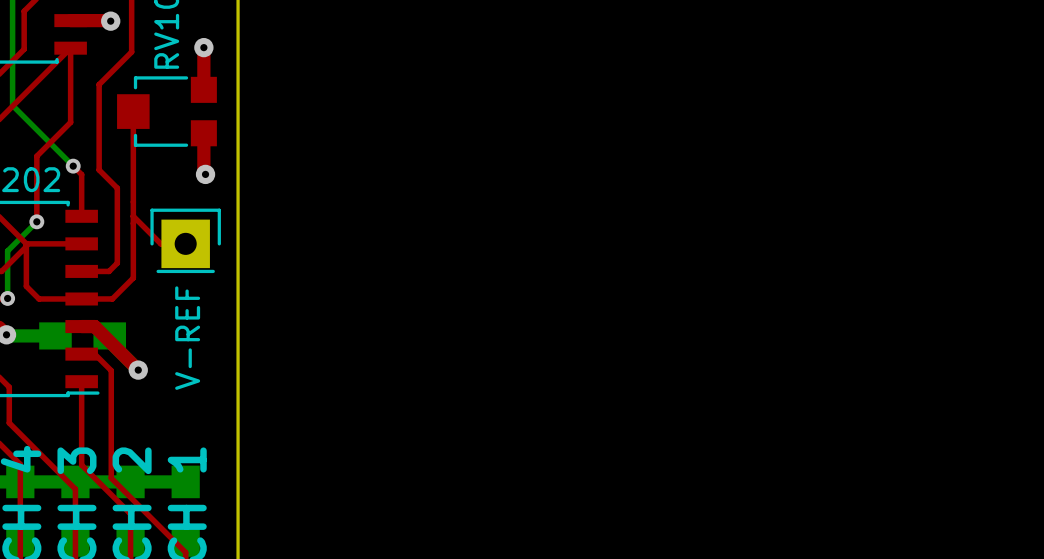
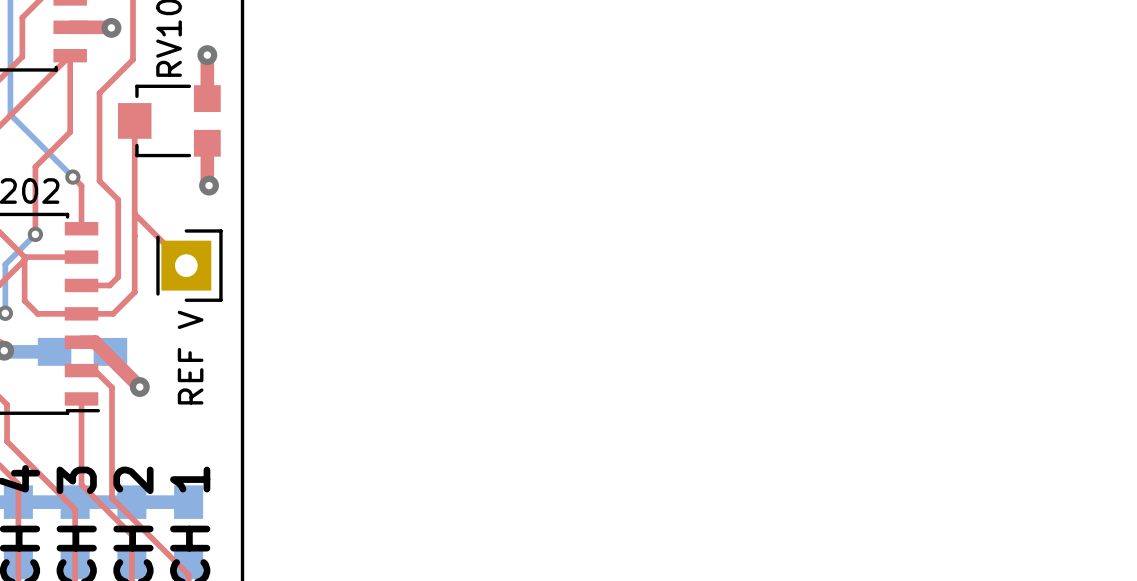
top track: none -> (134, 214) (186, 265)
top track: (133, 216) (160, 243) (185, 243) -> none
V-REF: (185, 240) -> none
REF V: none -> (189, 265)

